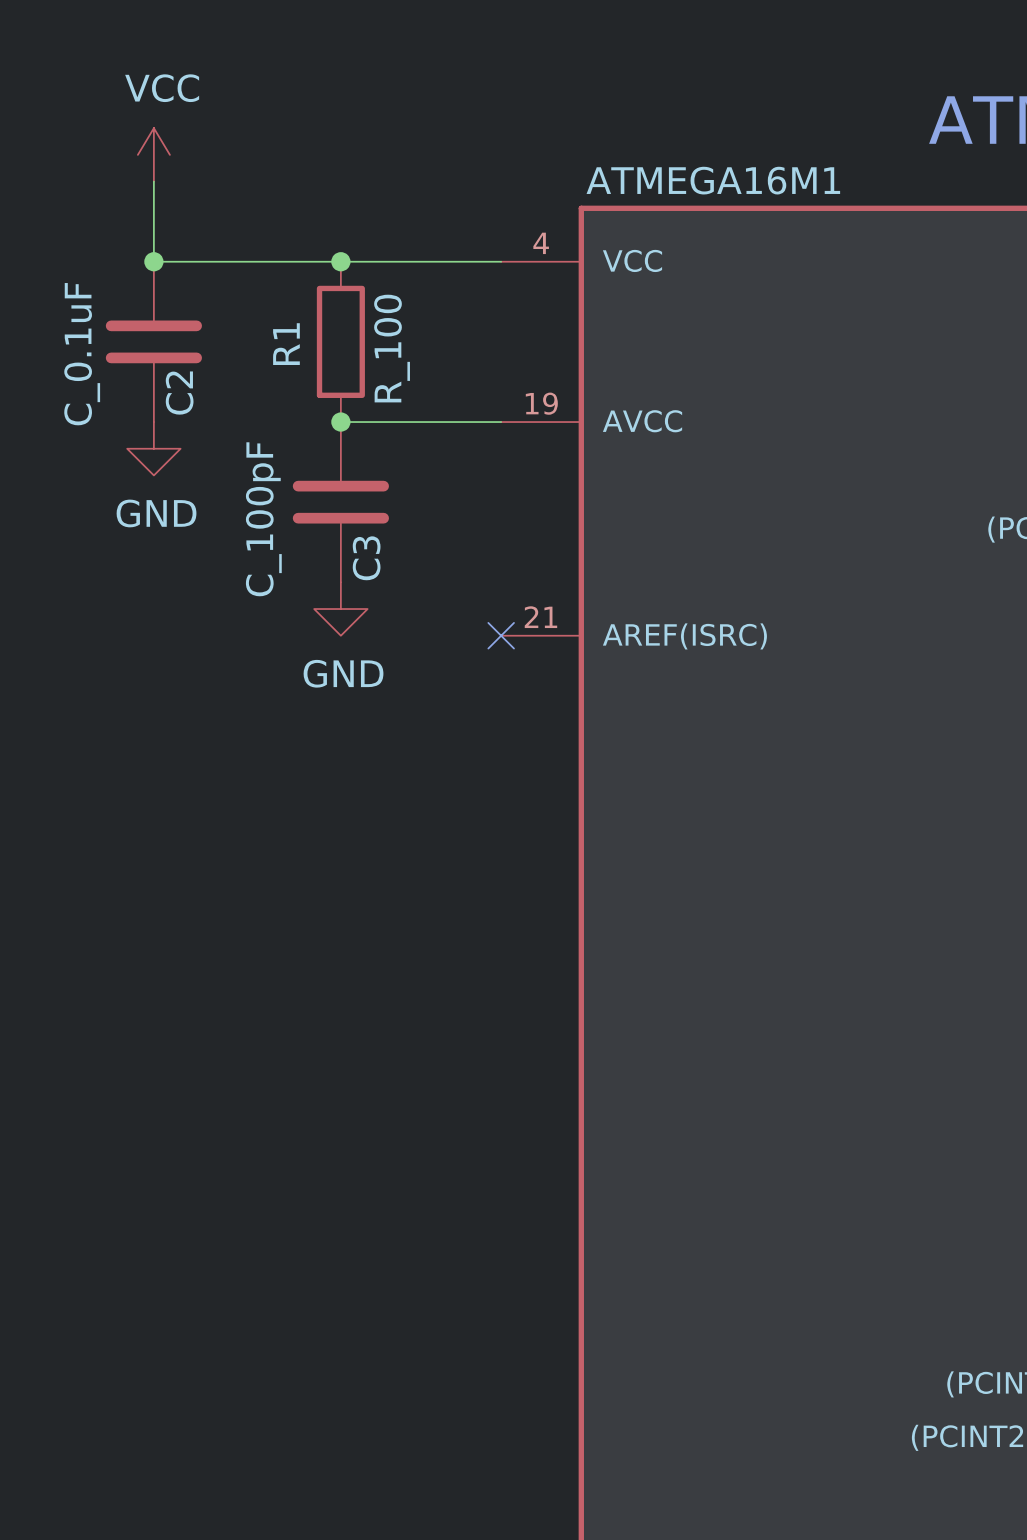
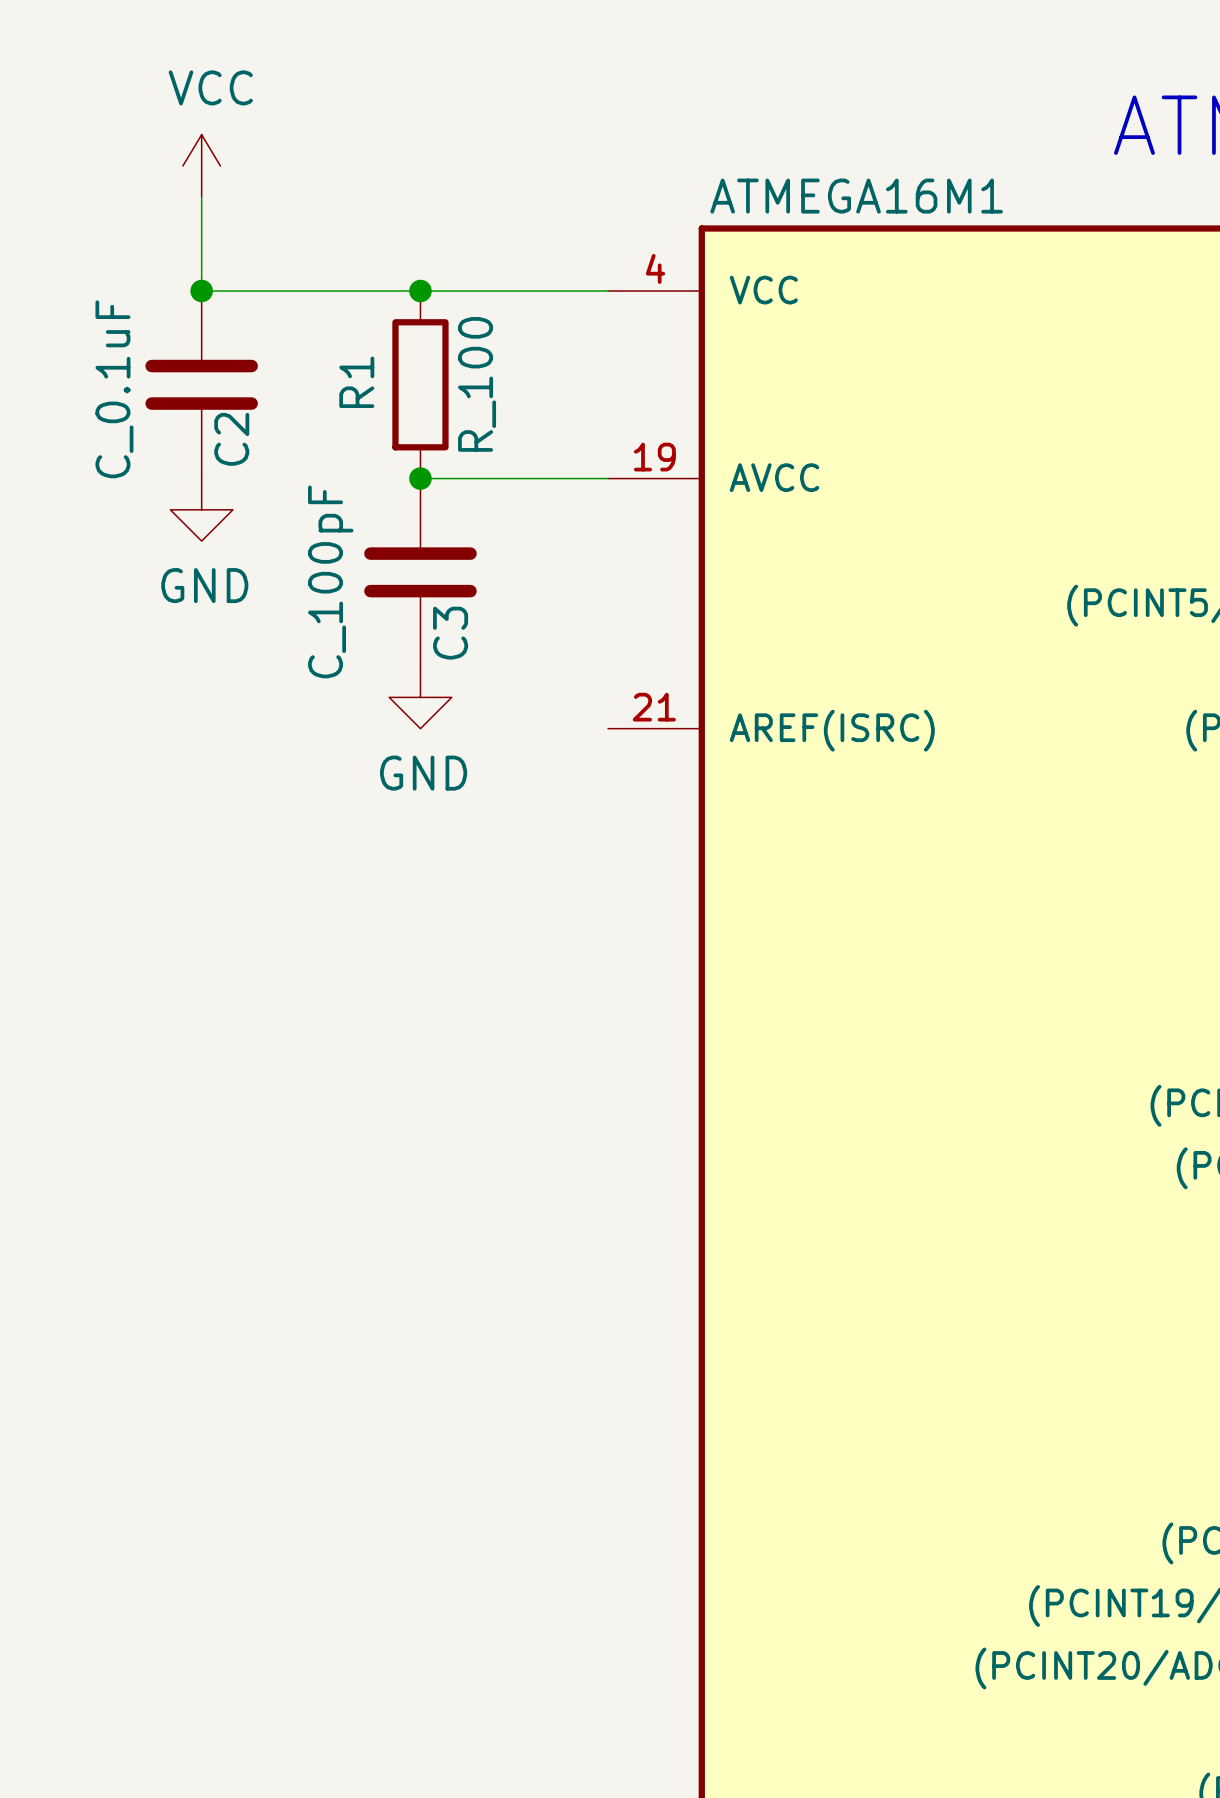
no-connect mark: (501, 635) -> none

